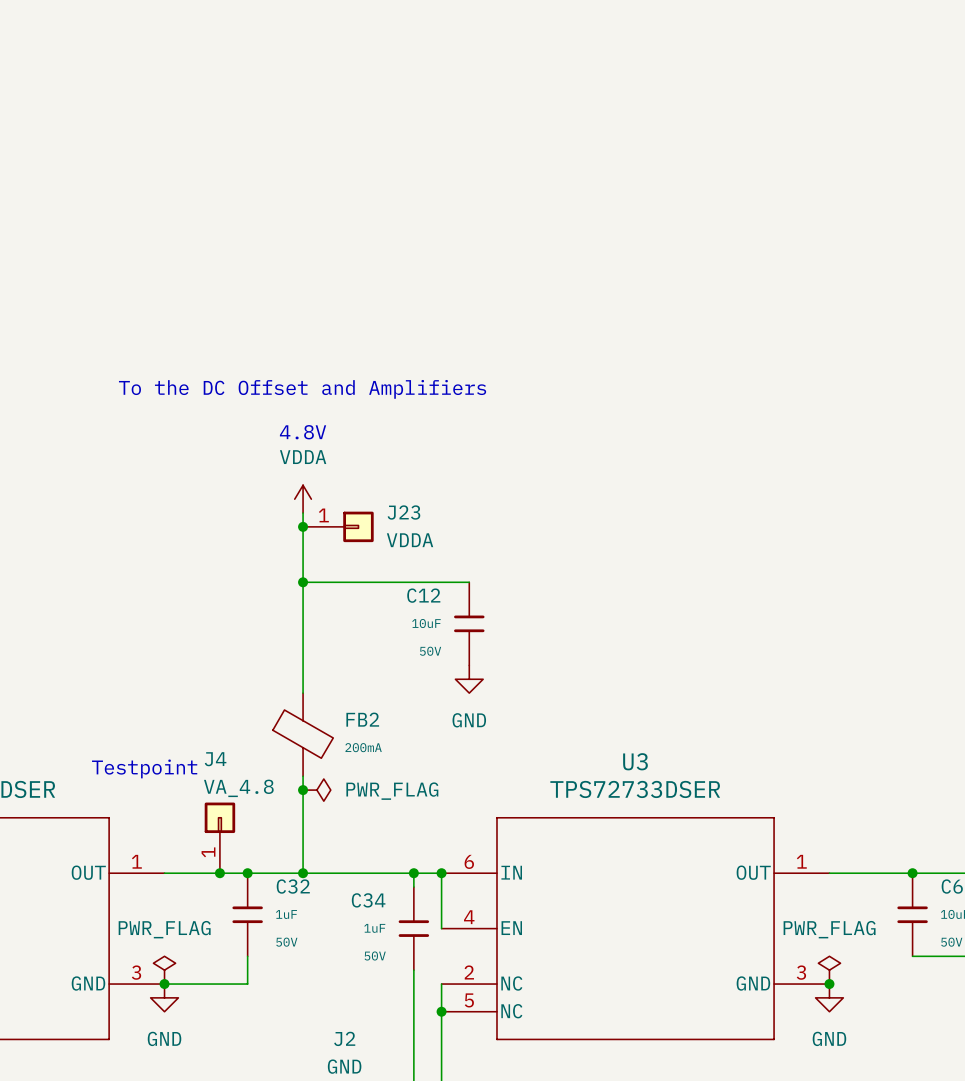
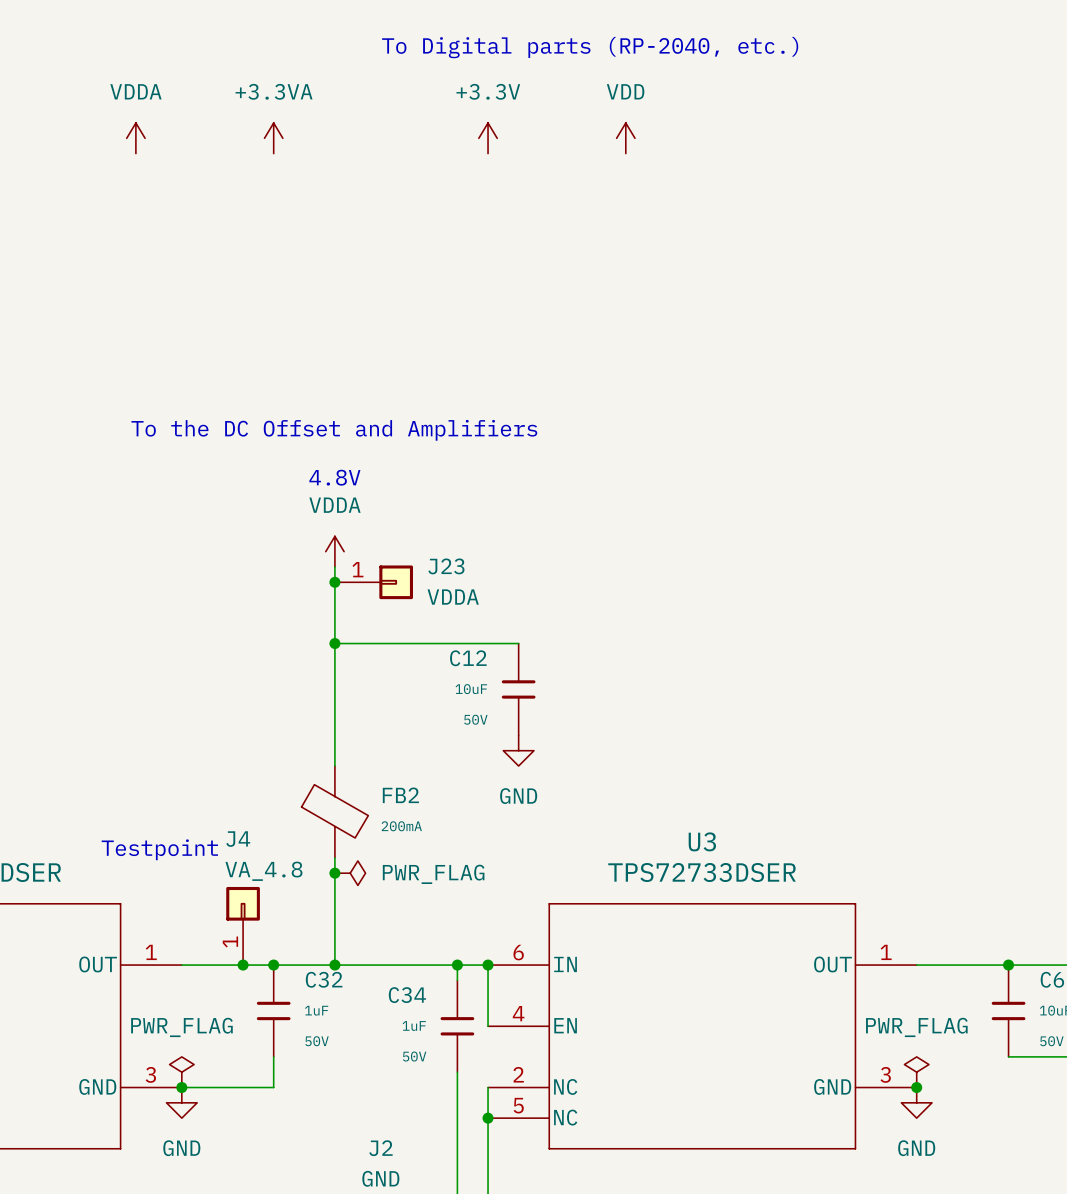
text: none -> To Digital parts (RP-2040, etc.) (590, 47)
power symbol: none -> VDDA (135, 138)
power symbol: none -> +3.3VA (273, 138)
power symbol: none -> +3.3V (488, 138)
power symbol: none -> VDD (625, 138)

